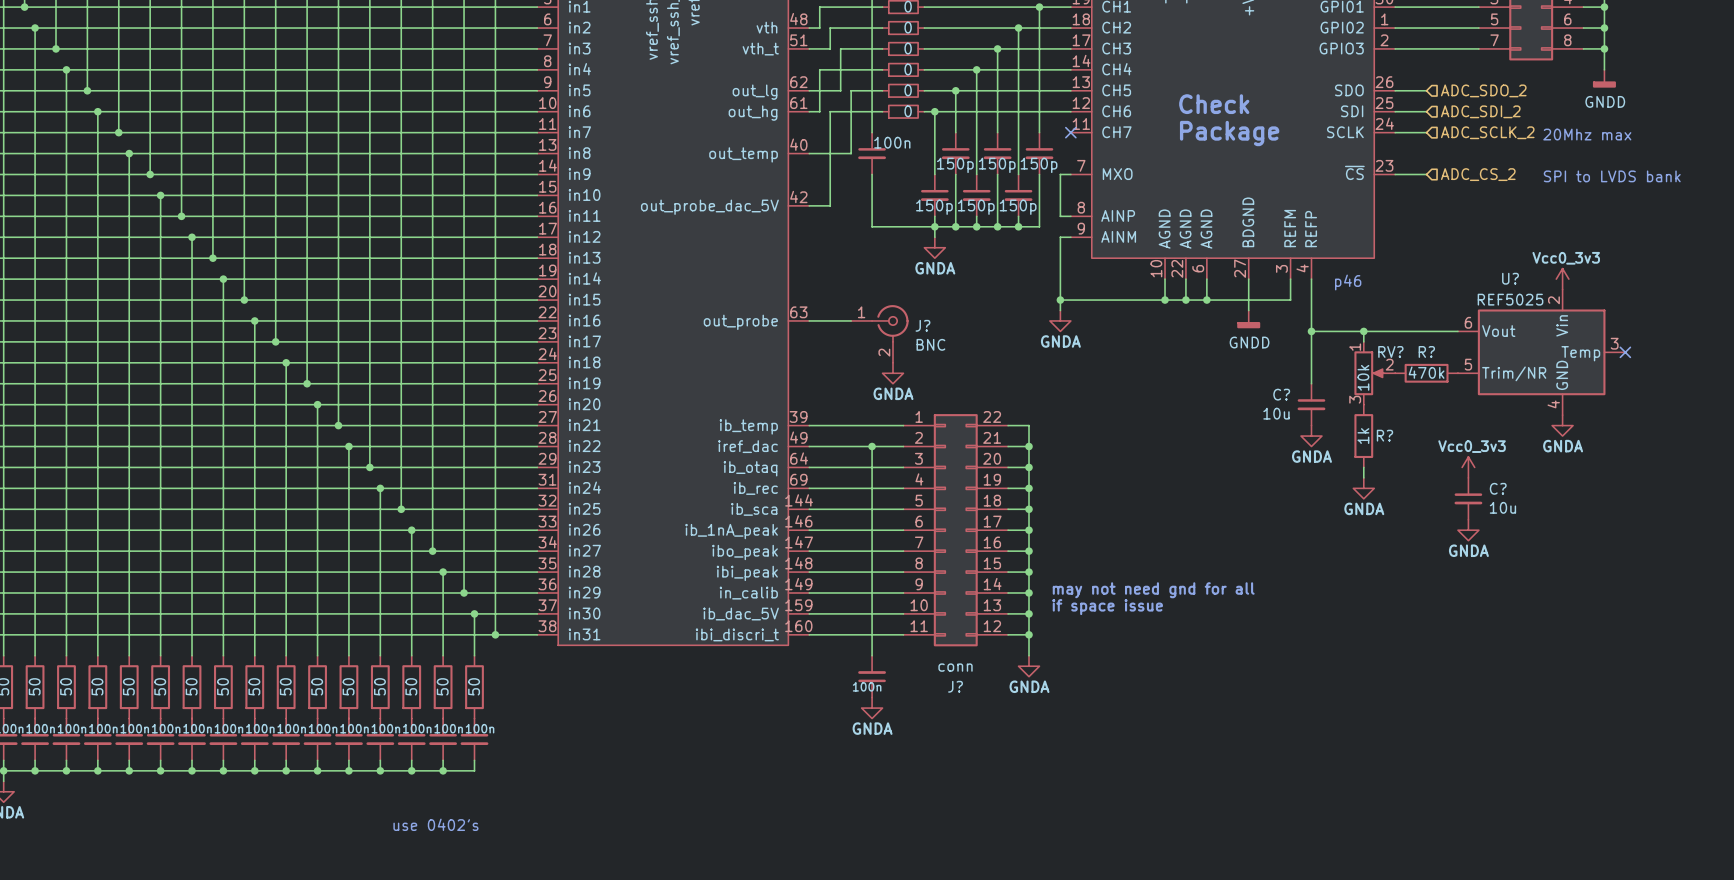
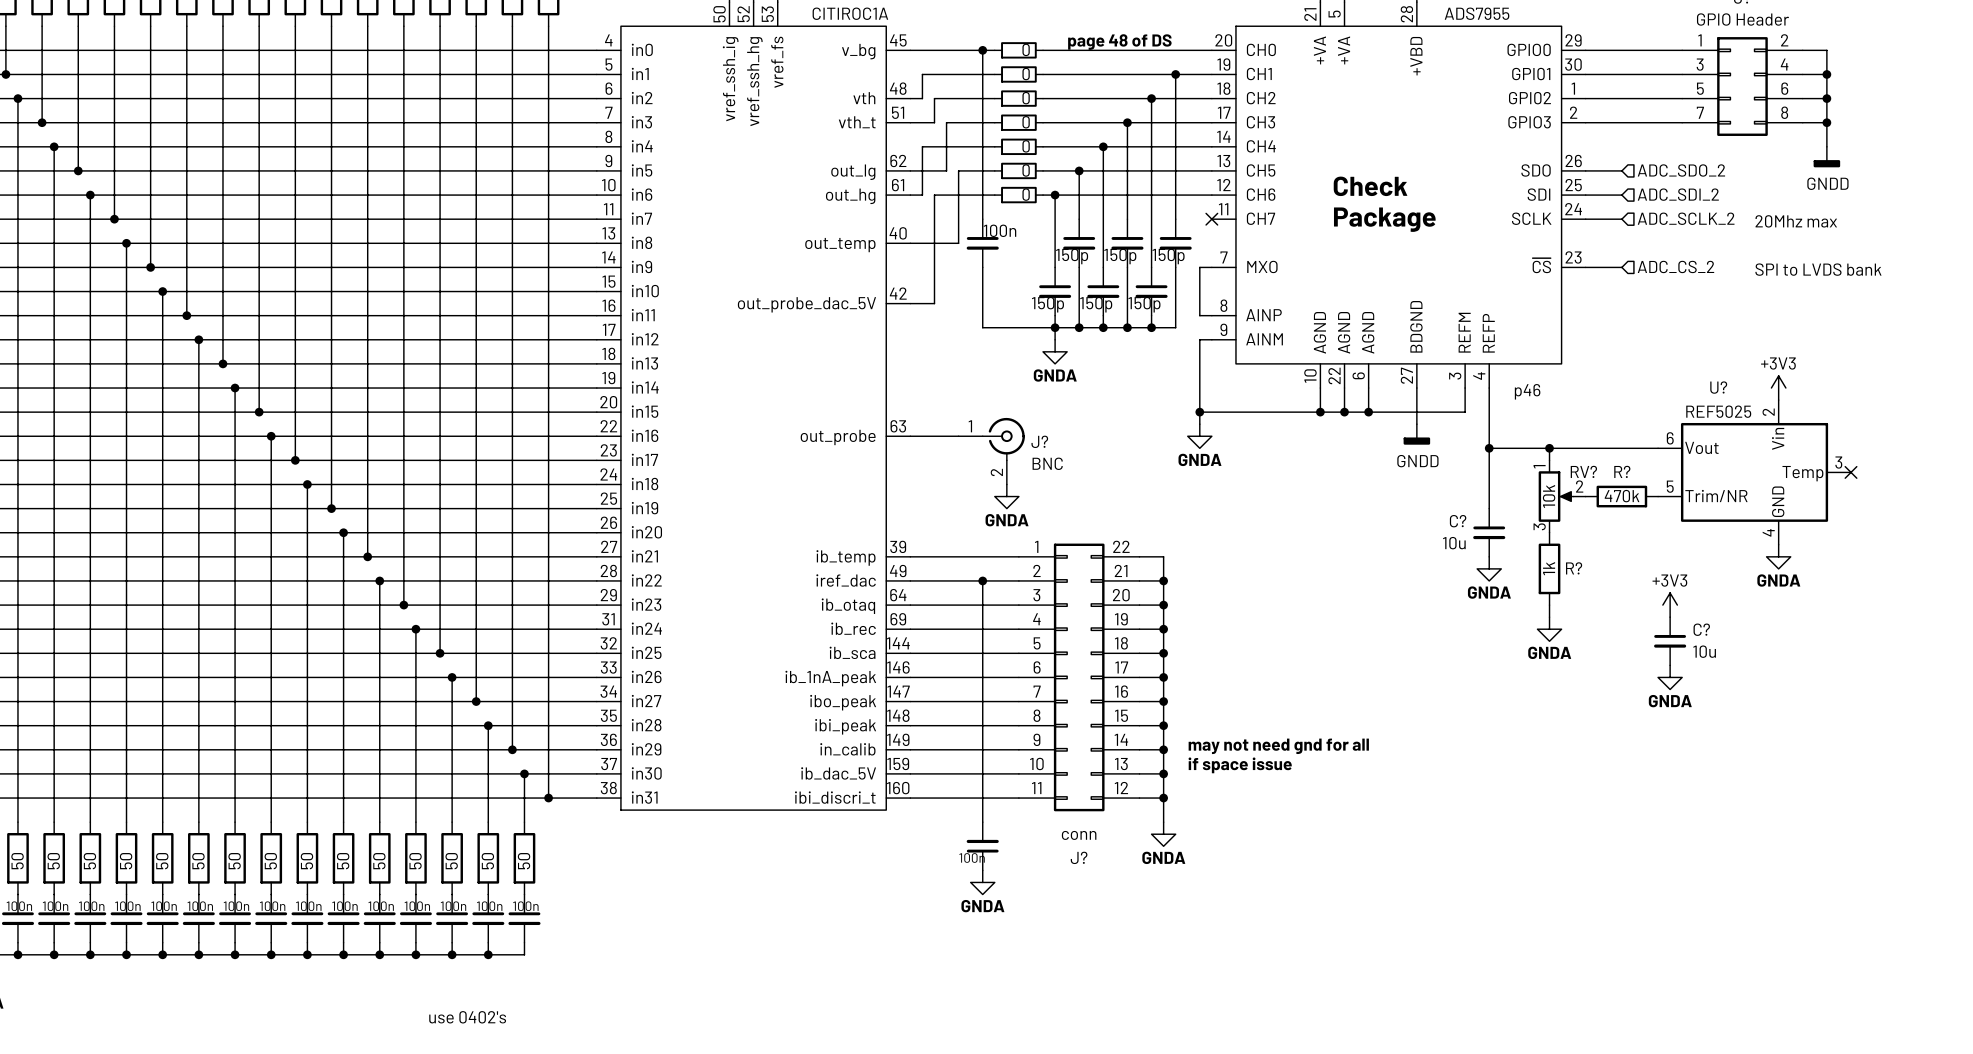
part: Vcc0_3v3 (1562, 279) -> none
power symbol: none -> +3V3 (1778, 388)
part: Vcc0_3v3 (1468, 467) -> none
power symbol: none -> +3V3 (1670, 605)

